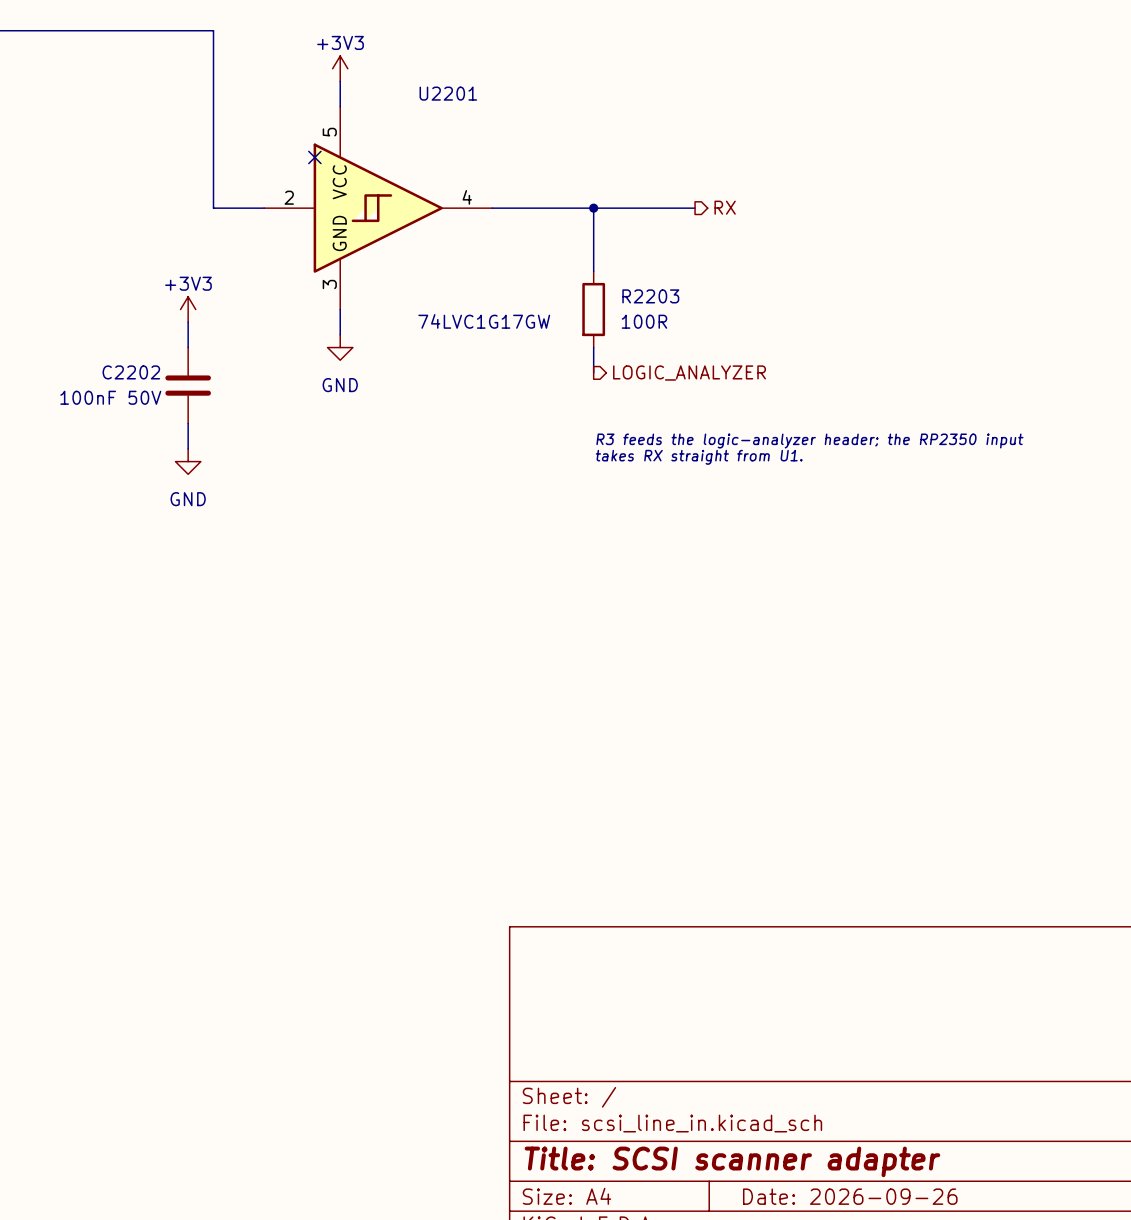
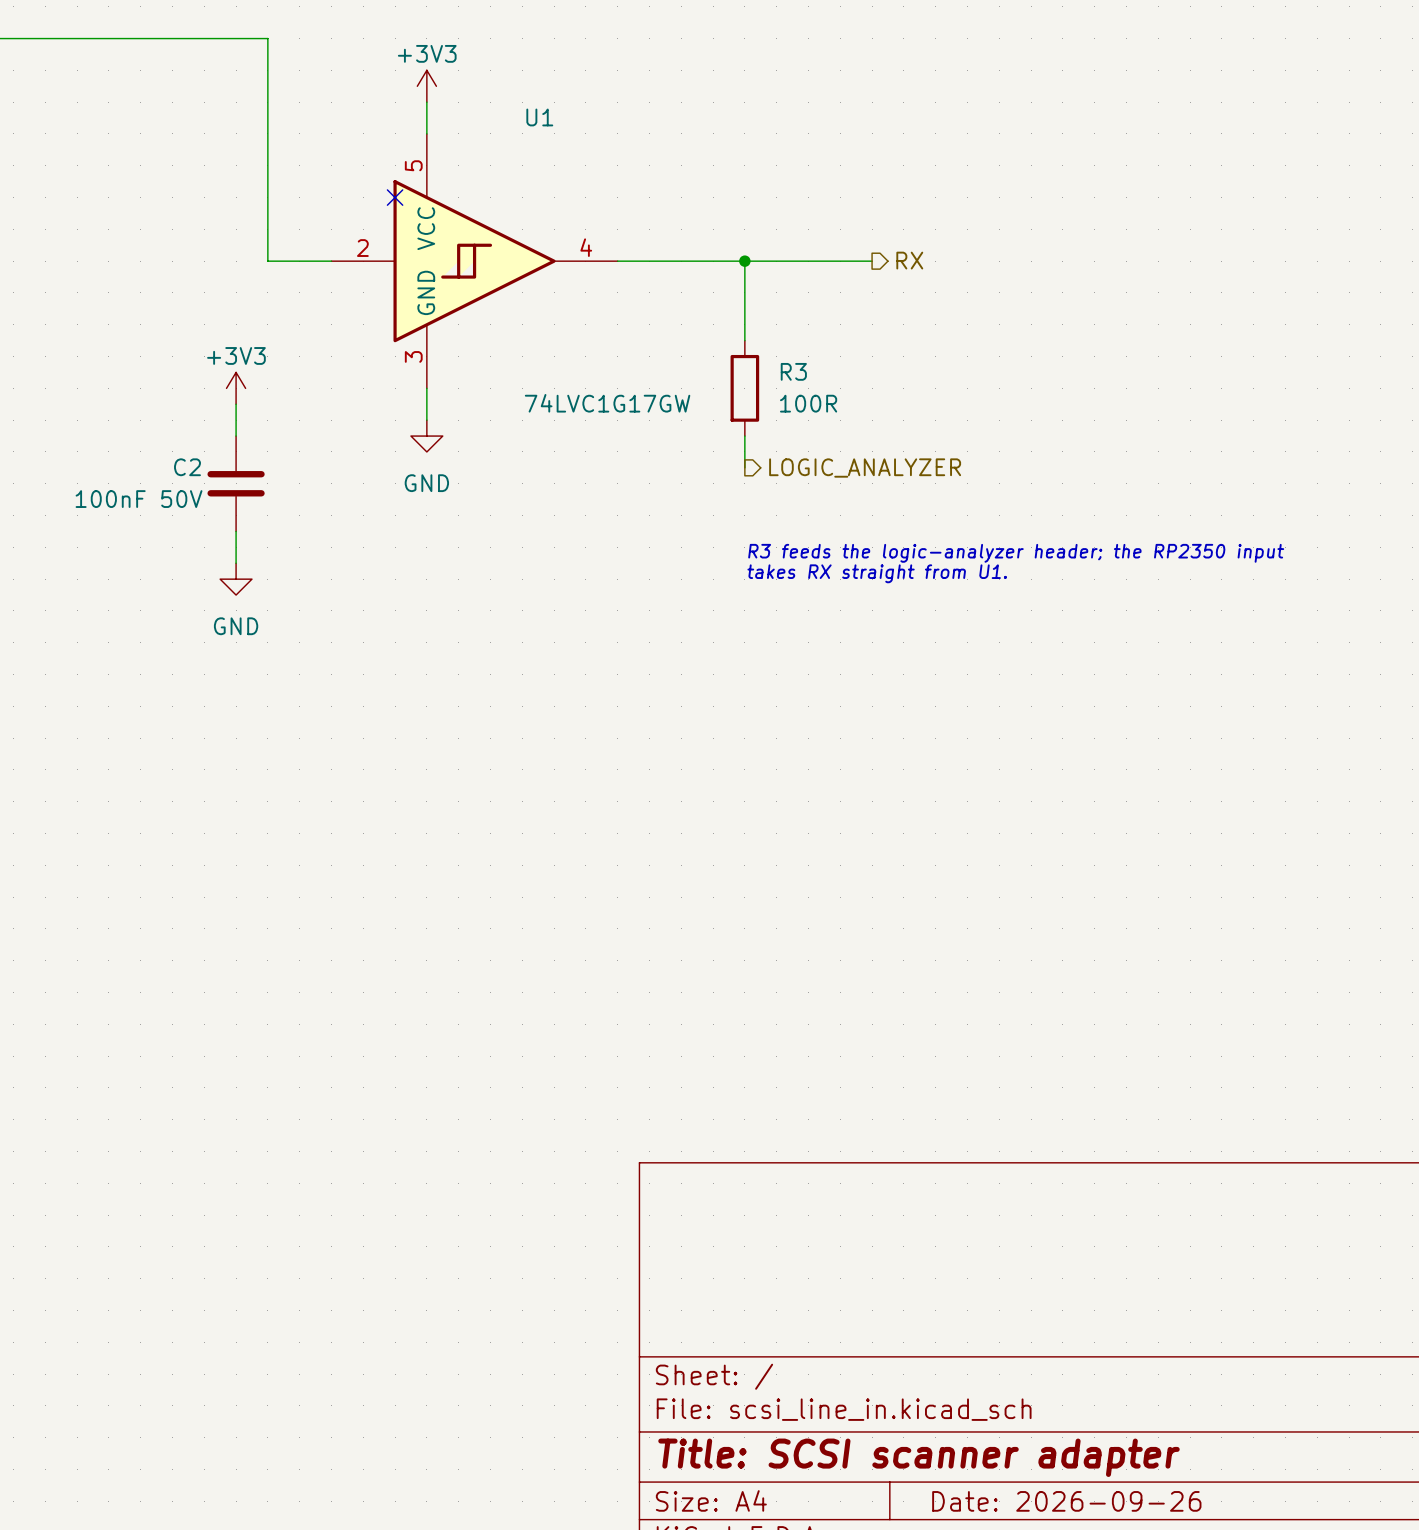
U2201 name: U2201 (448, 93) -> U1 (539, 117)
R2203 name: R2203 (650, 296) -> R3 (793, 371)
C2202 name: C2202 (131, 372) -> C2 (187, 467)

